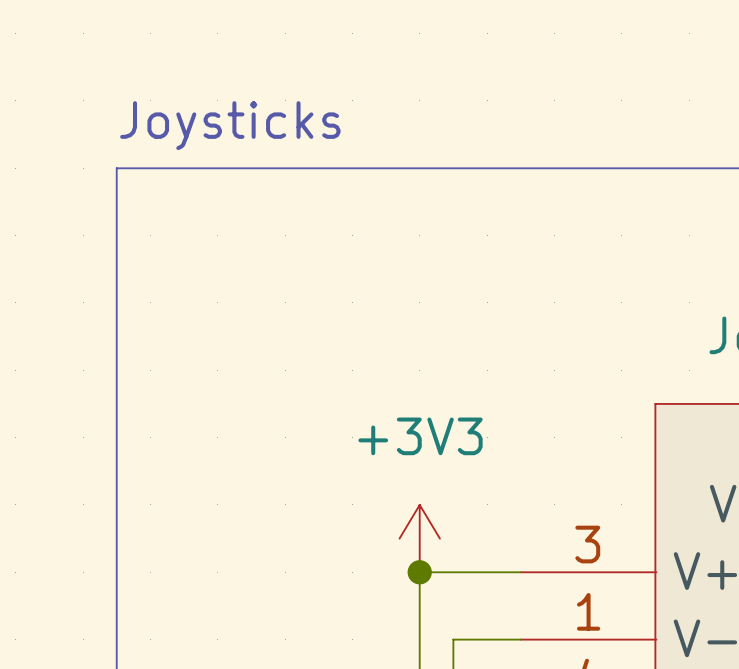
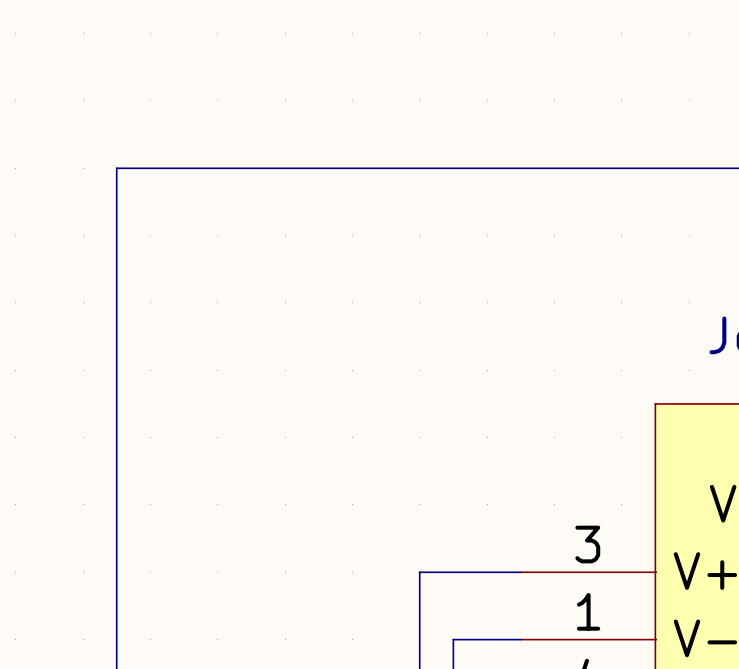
text: Joysticks (230, 125) -> none
power symbol: +3V3 (419, 538) -> none
junction: (419, 572) -> none

